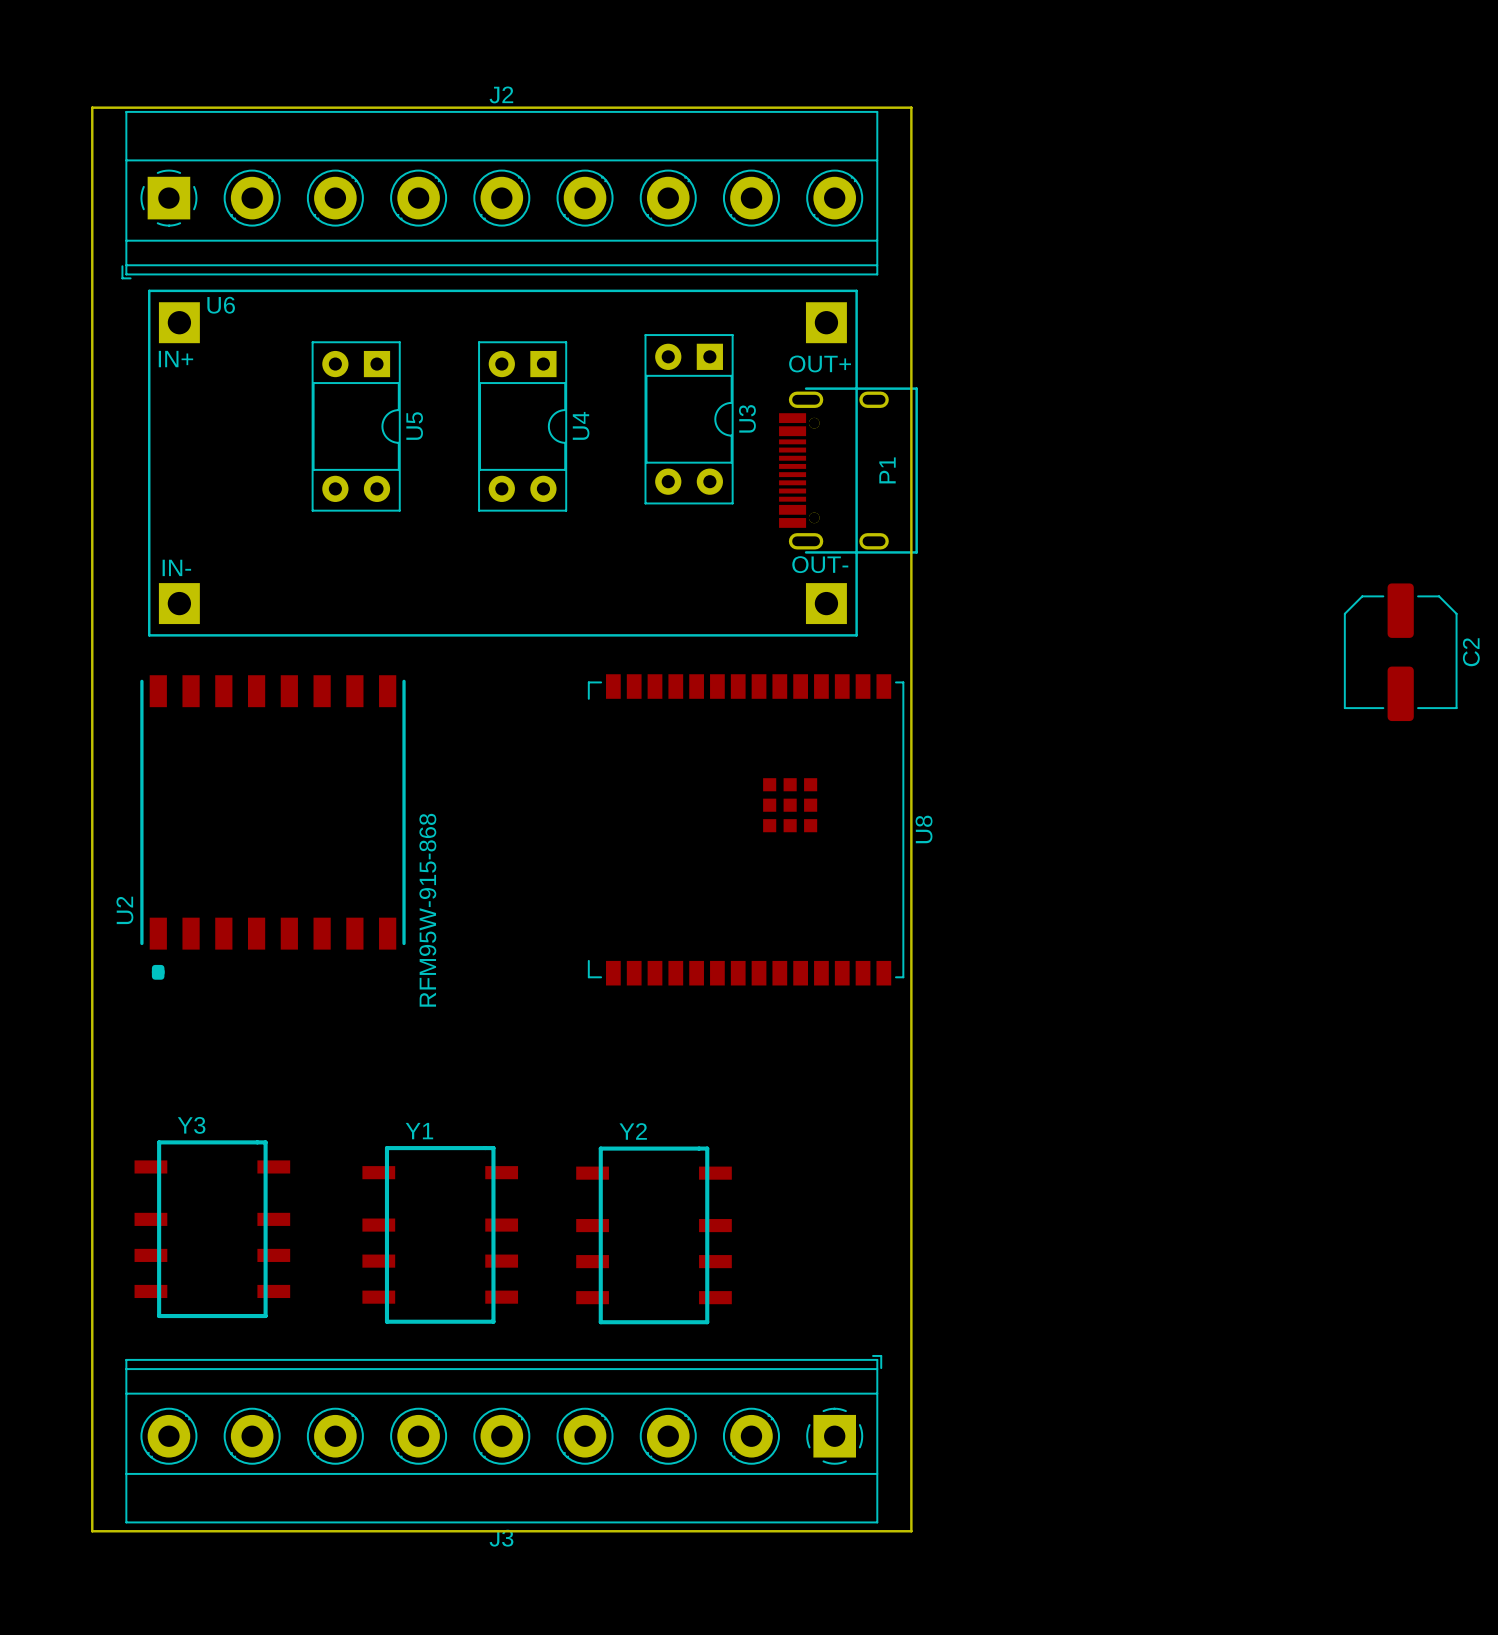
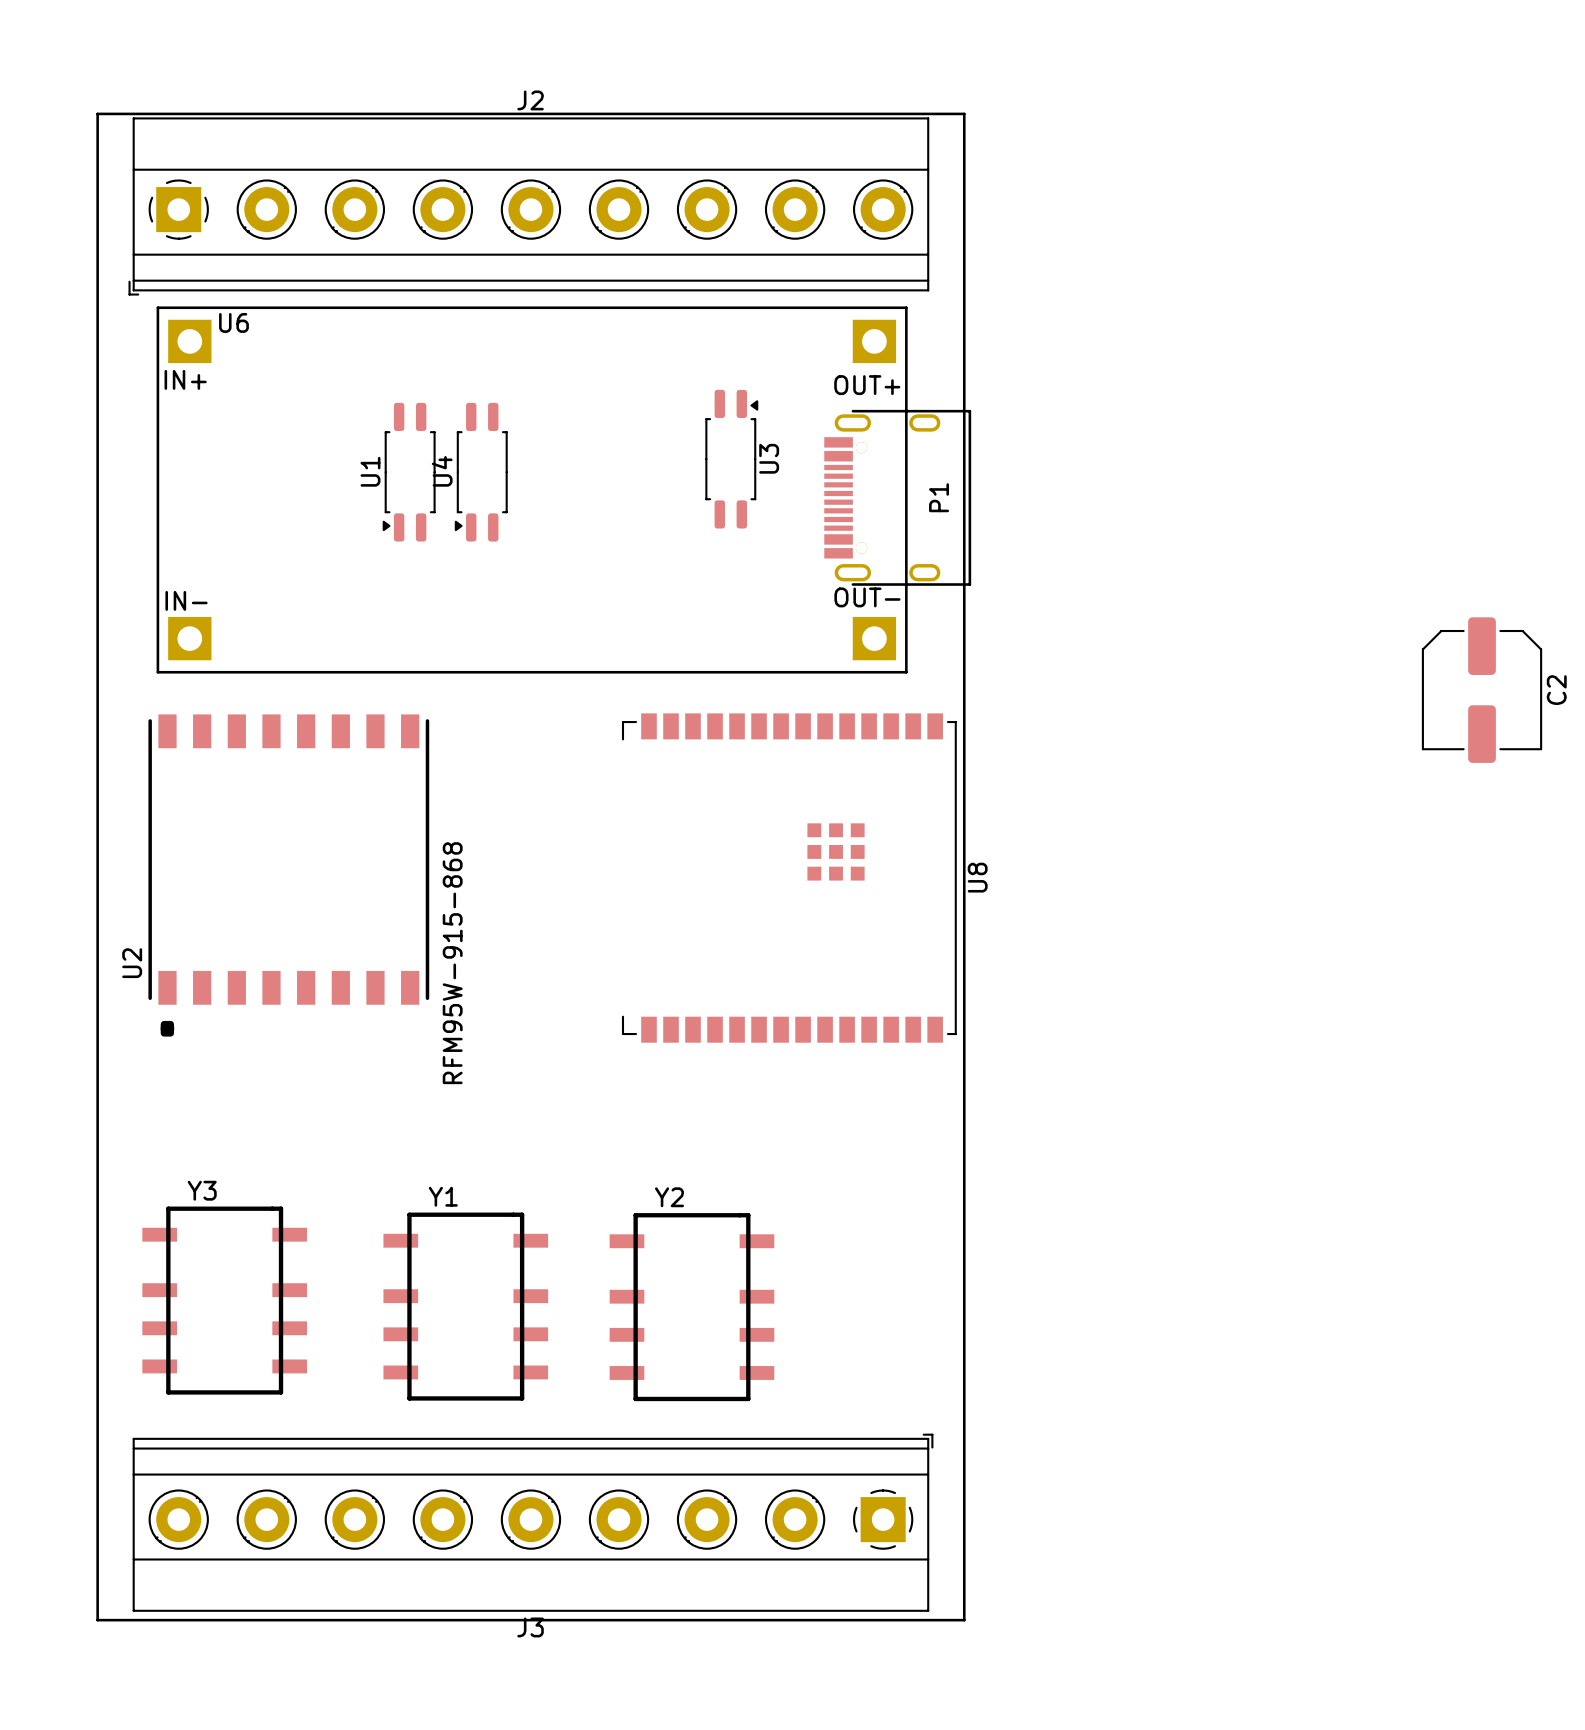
U3 footprint: [644, 334, 734, 505] -> [705, 389, 759, 529]
U4 footprint: [478, 341, 568, 512] -> [454, 402, 508, 542]
U4 name position: U4 (581, 425) -> U4 (442, 471)
U5: (356, 426) -> none
U1: none -> (409, 472)

